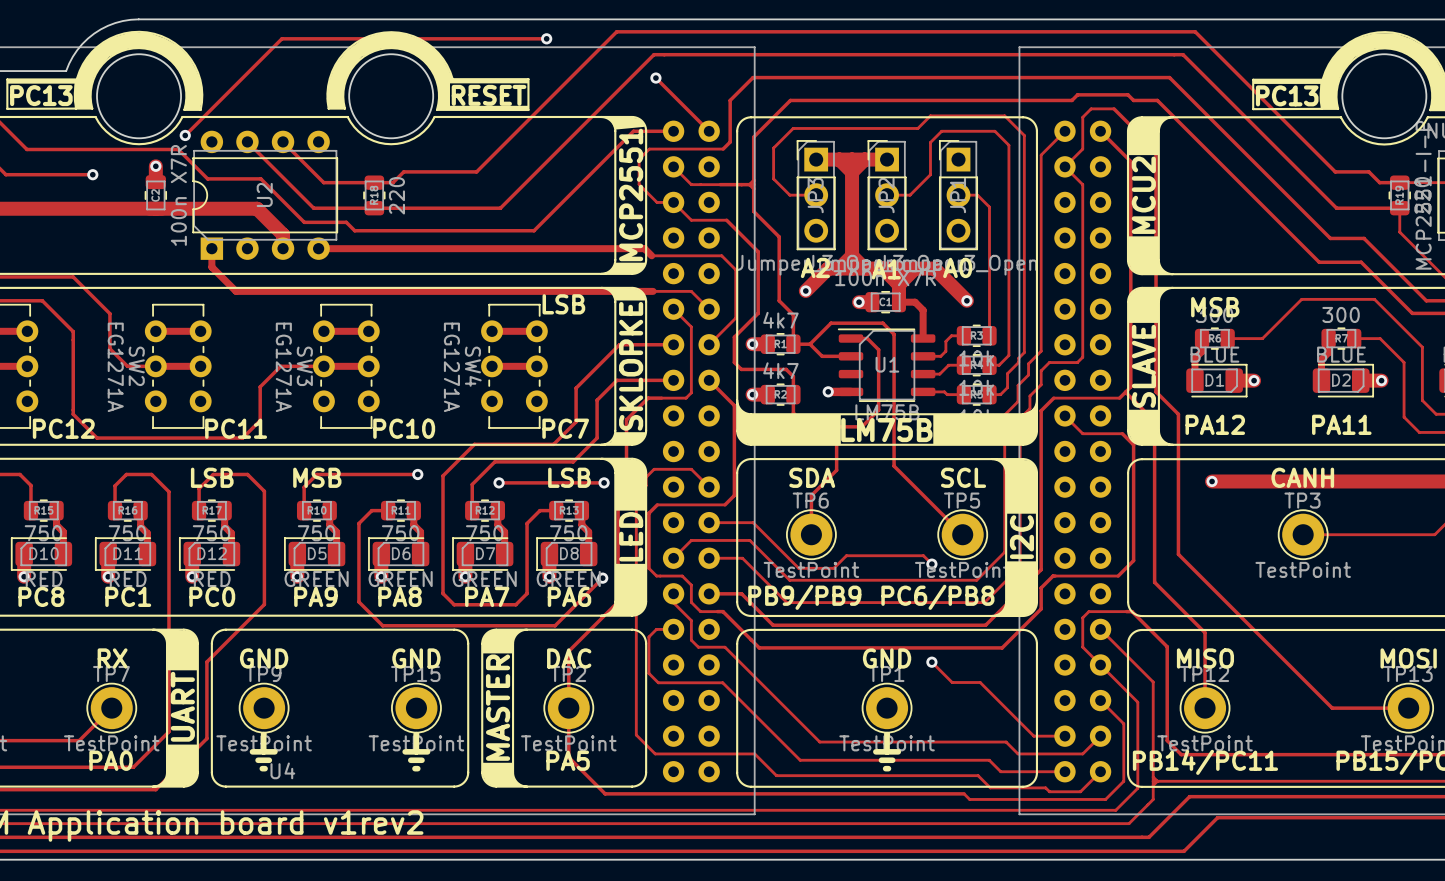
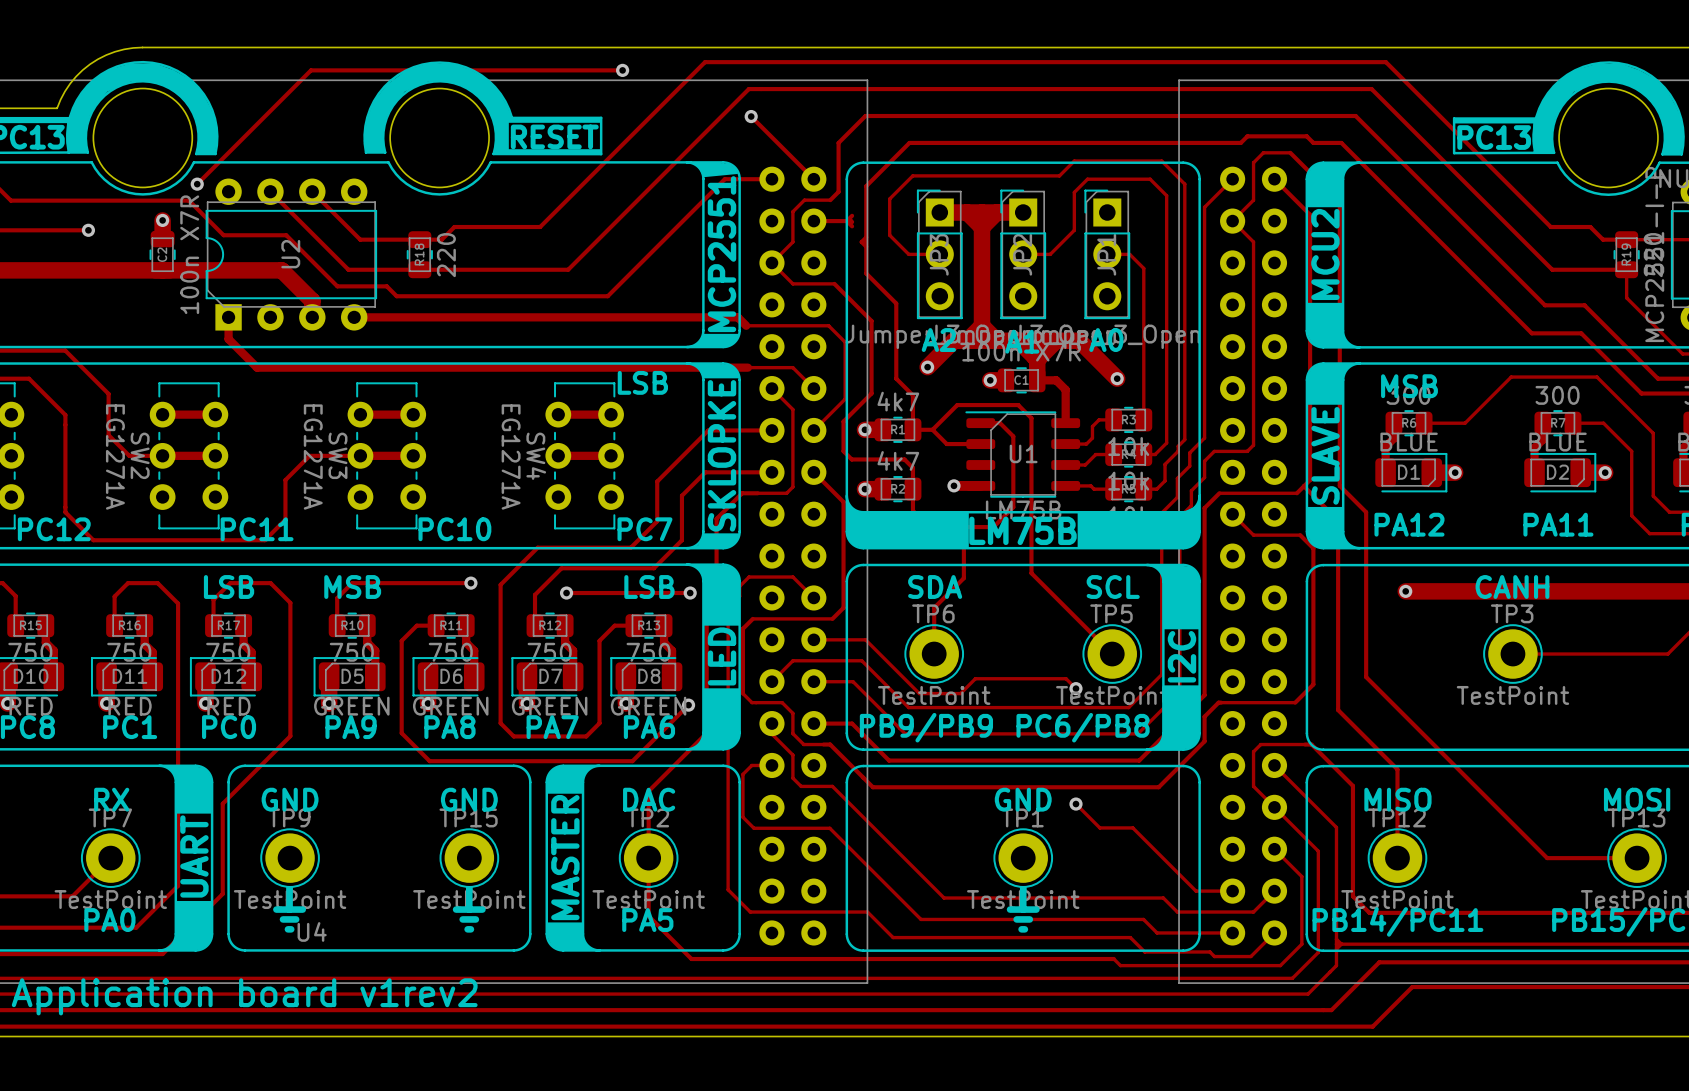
track: (701, 149) (649, 149) (639, 159) (639, 184) (657, 202) (673, 202) -> (804, 200) (792, 211) (792, 242) (771, 262)
track: none -> (852, 215) (846, 221) (852, 226)
track: (673, 166) (691, 184) (753, 184) -> none
track: none -> (813, 221) (852, 222)

